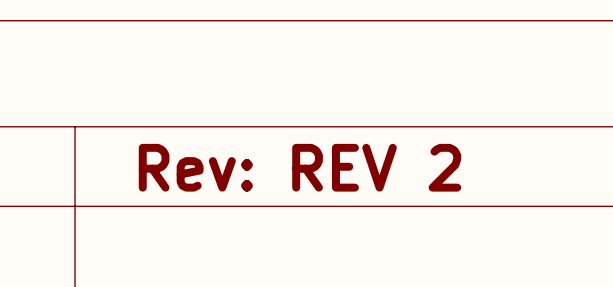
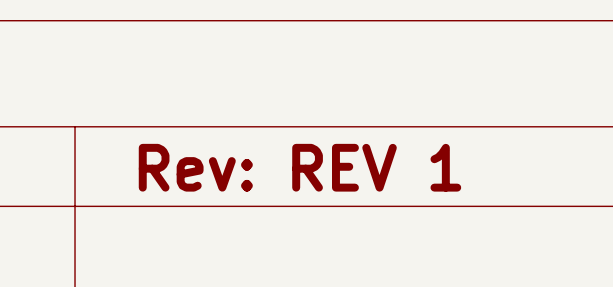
title block: Rev: REV 2 (299, 167) -> Rev: REV 1 (299, 167)

